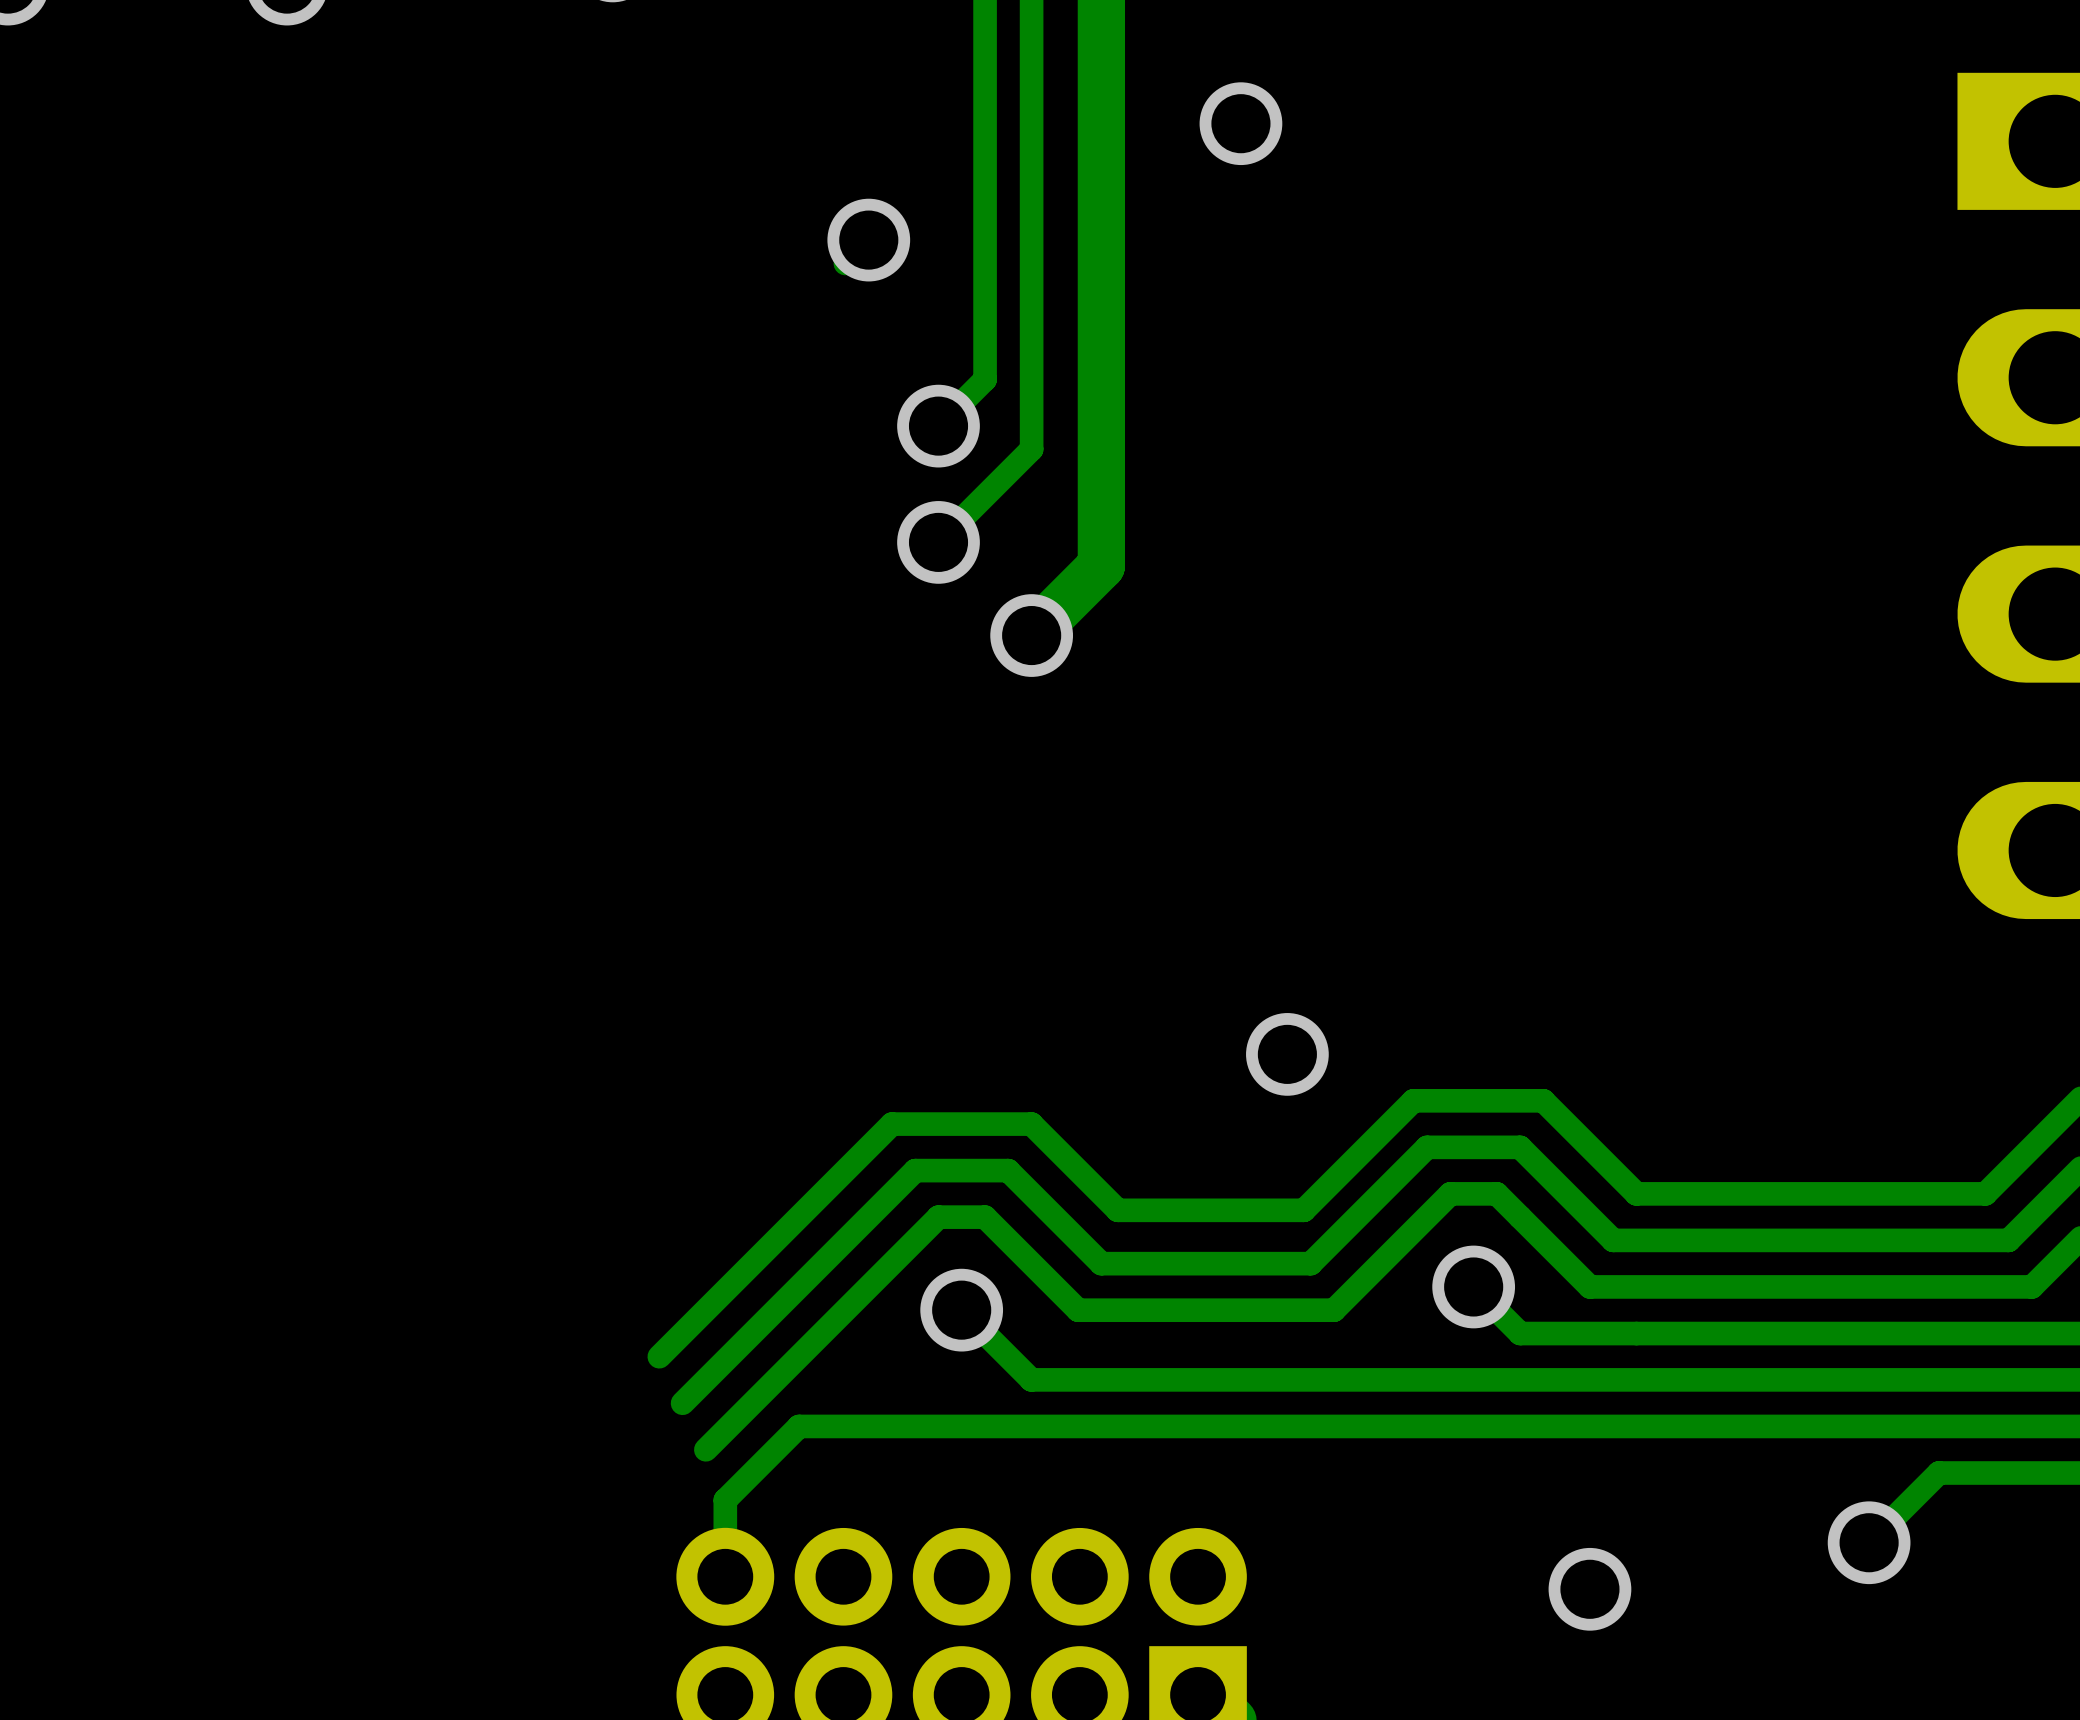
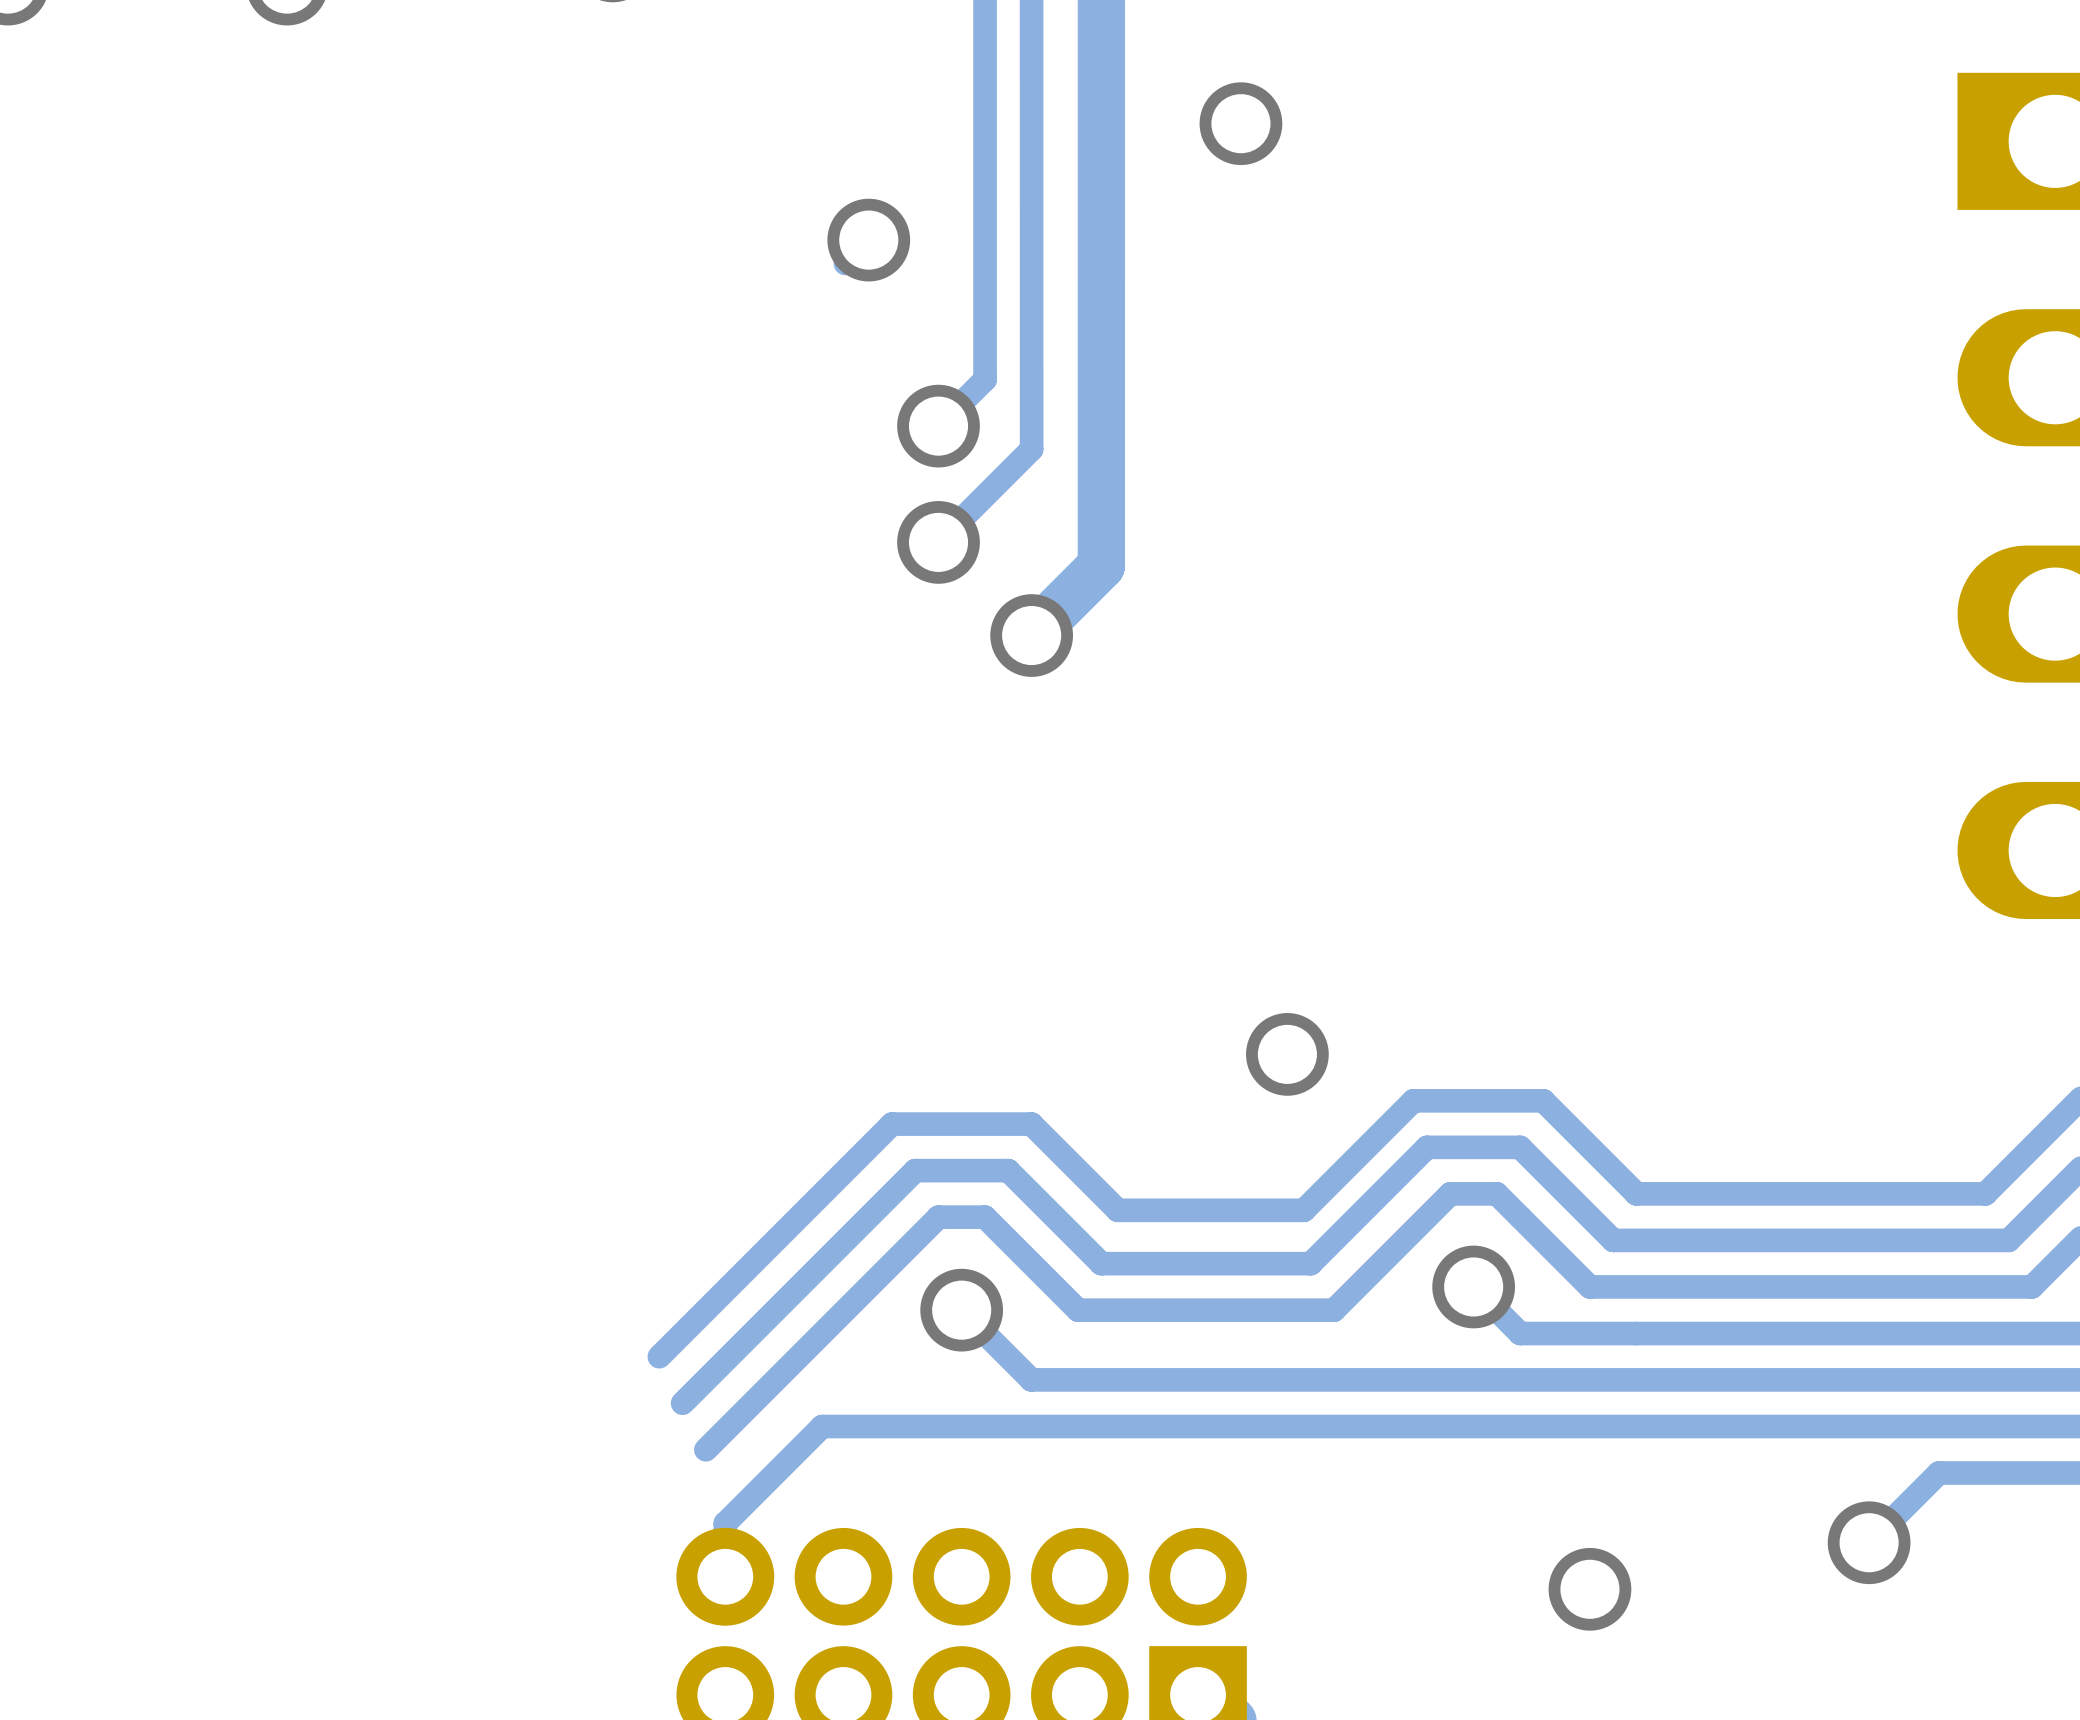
track: (822, 1426) (799, 1426) (725, 1500) (725, 1523) -> (822, 1426) (725, 1523)

